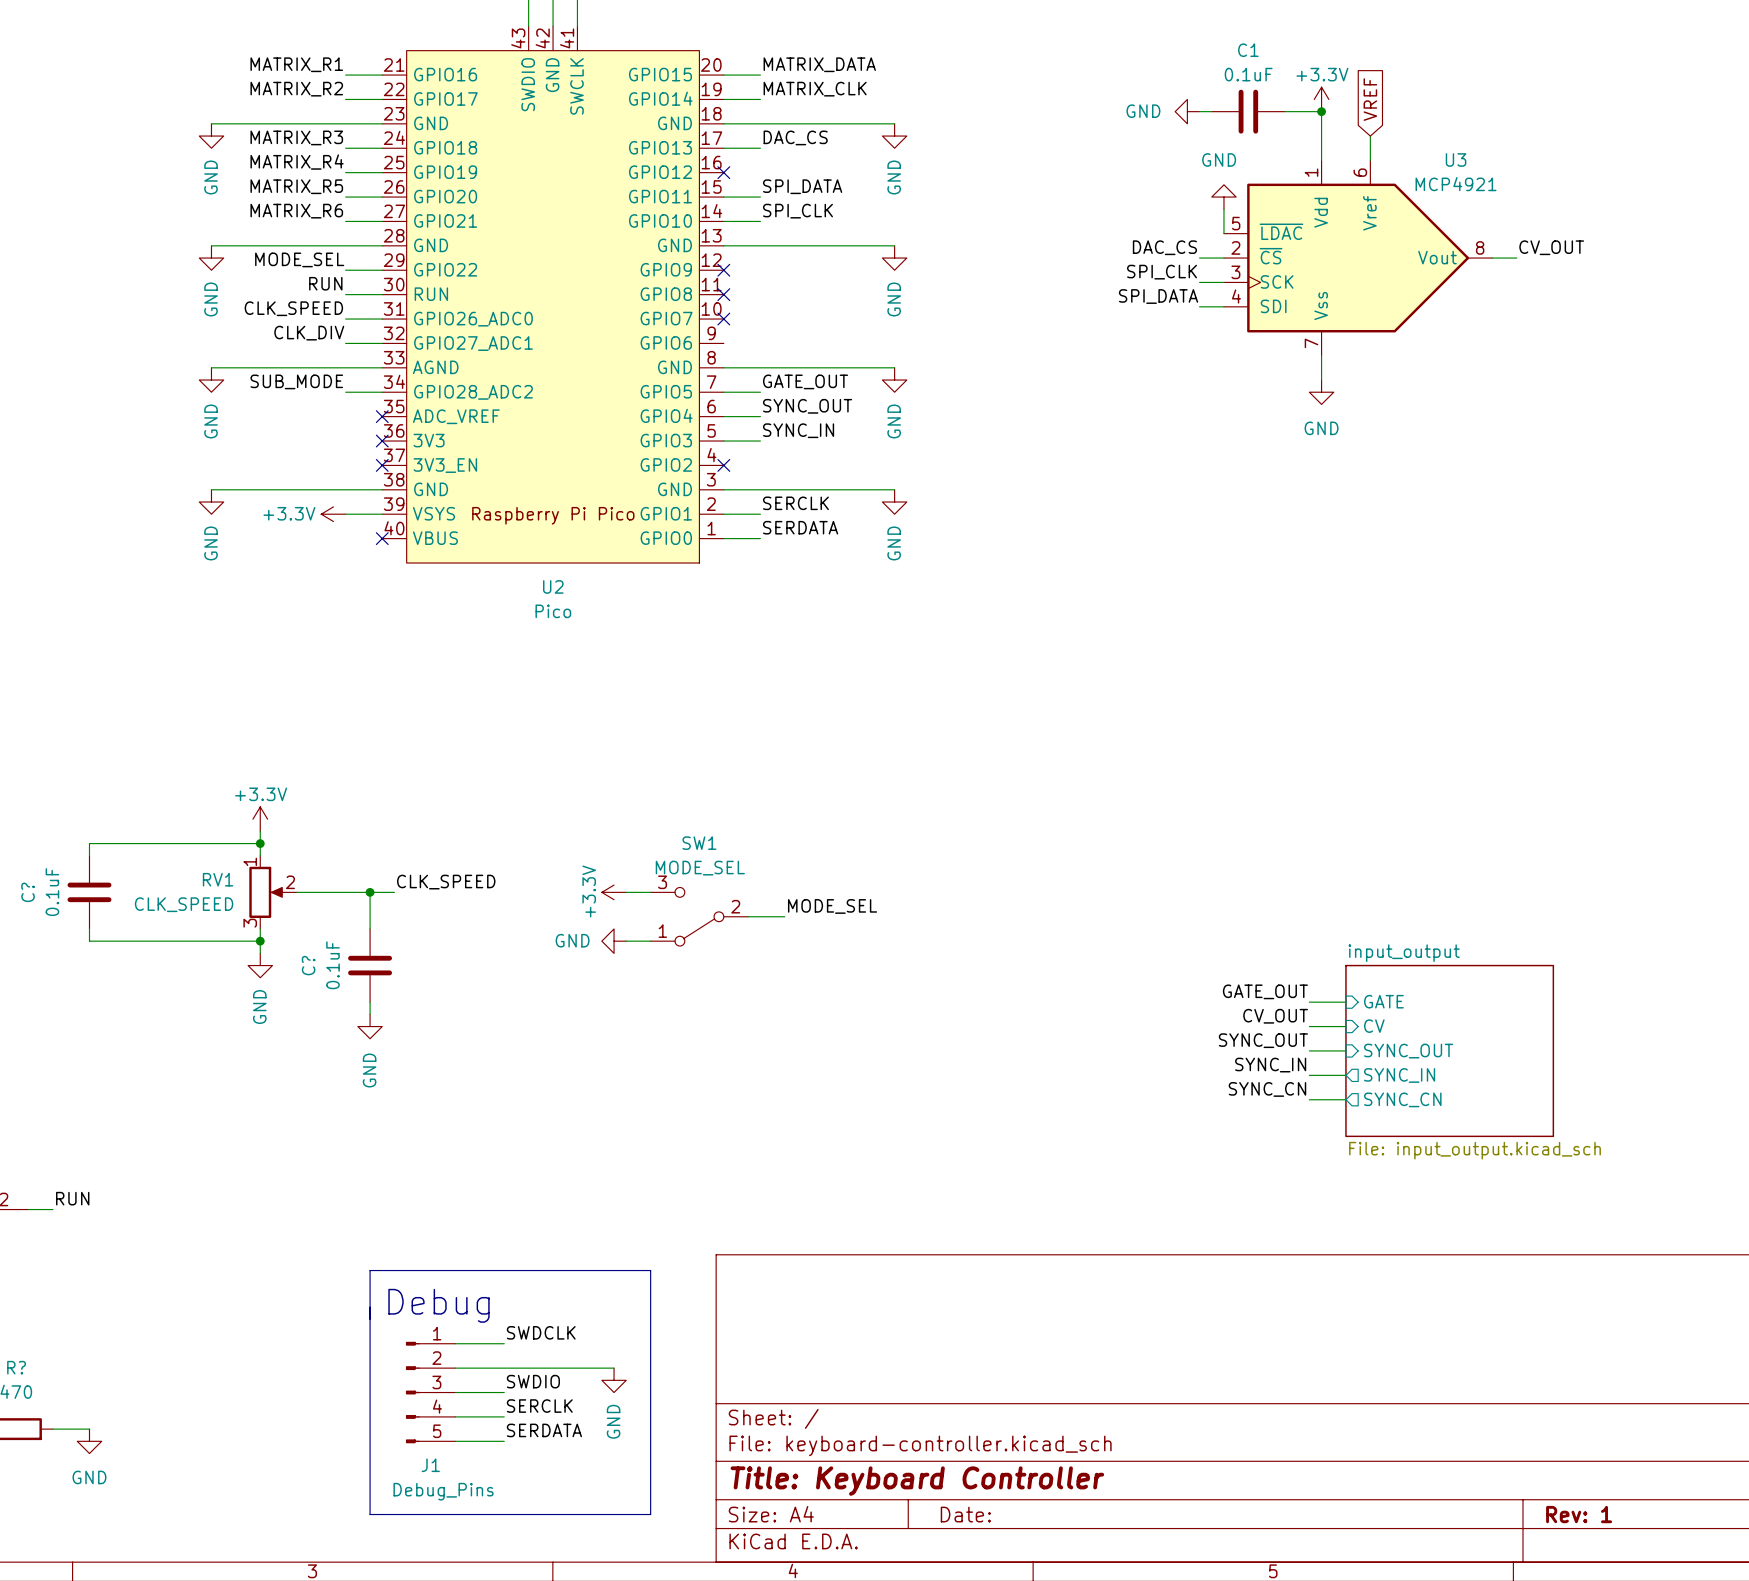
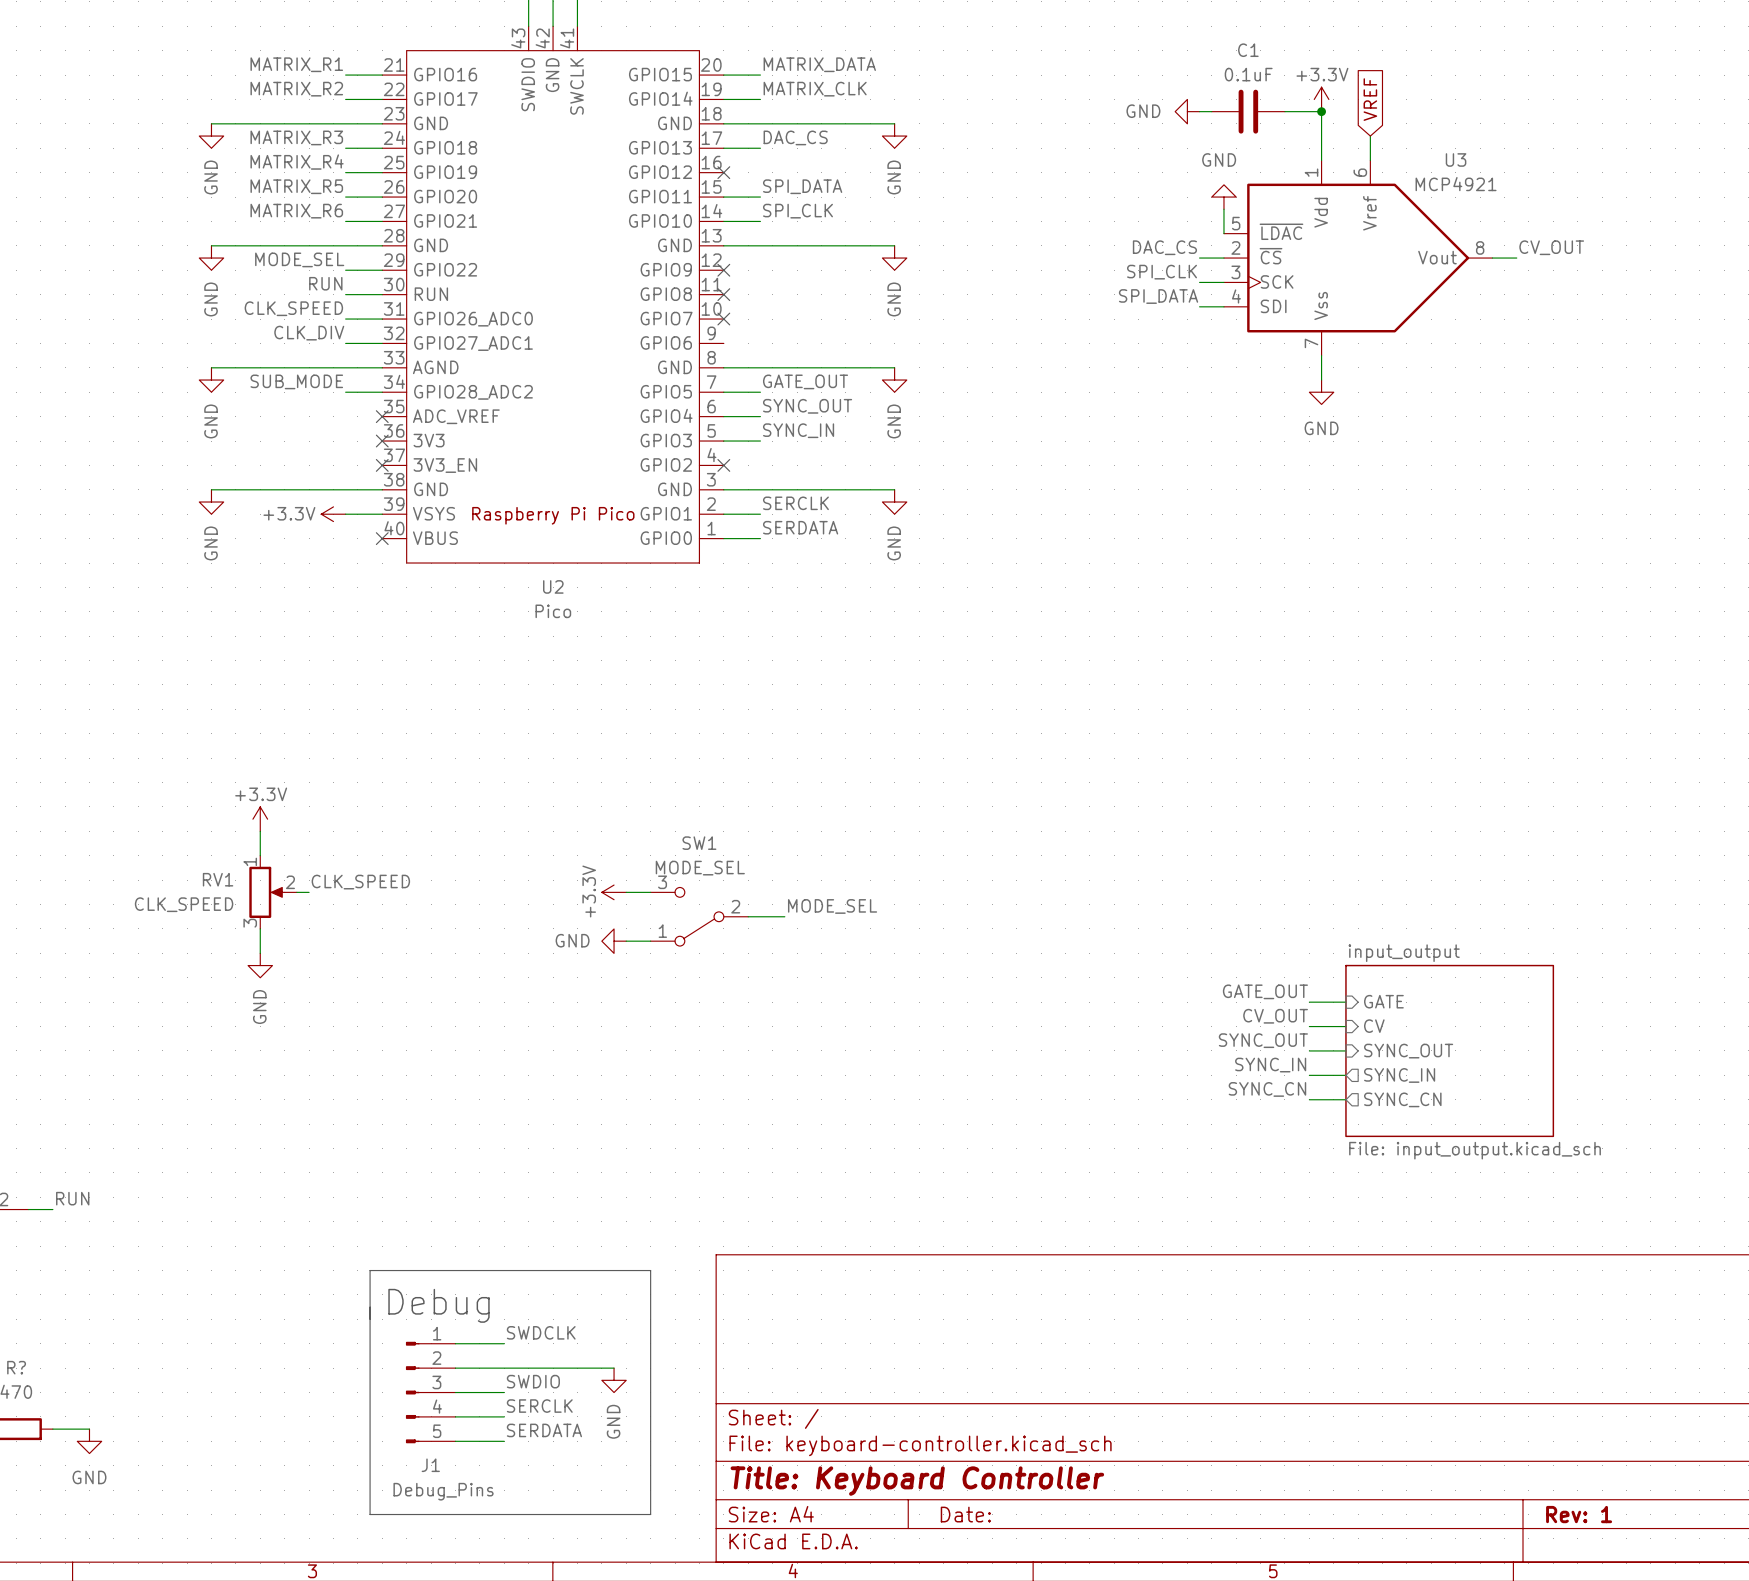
wire: (260, 843) (89, 843) (89, 855) -> none
junction: (260, 843) -> none
label position: CLK_SPEED (446, 882) -> CLK_SPEED (360, 882)
C?: 0.1uF (89, 892) -> none
wire: (309, 892) (394, 892) -> none
wire: (370, 892) (370, 928) -> none
junction: (370, 892) -> none
wire: (89, 928) (89, 941) (260, 941) -> none
junction: (260, 941) -> none
C?: 0.1uF (370, 965) -> none
wire: (370, 1002) (370, 1014) -> none
power symbol: GND (370, 1026) -> none

